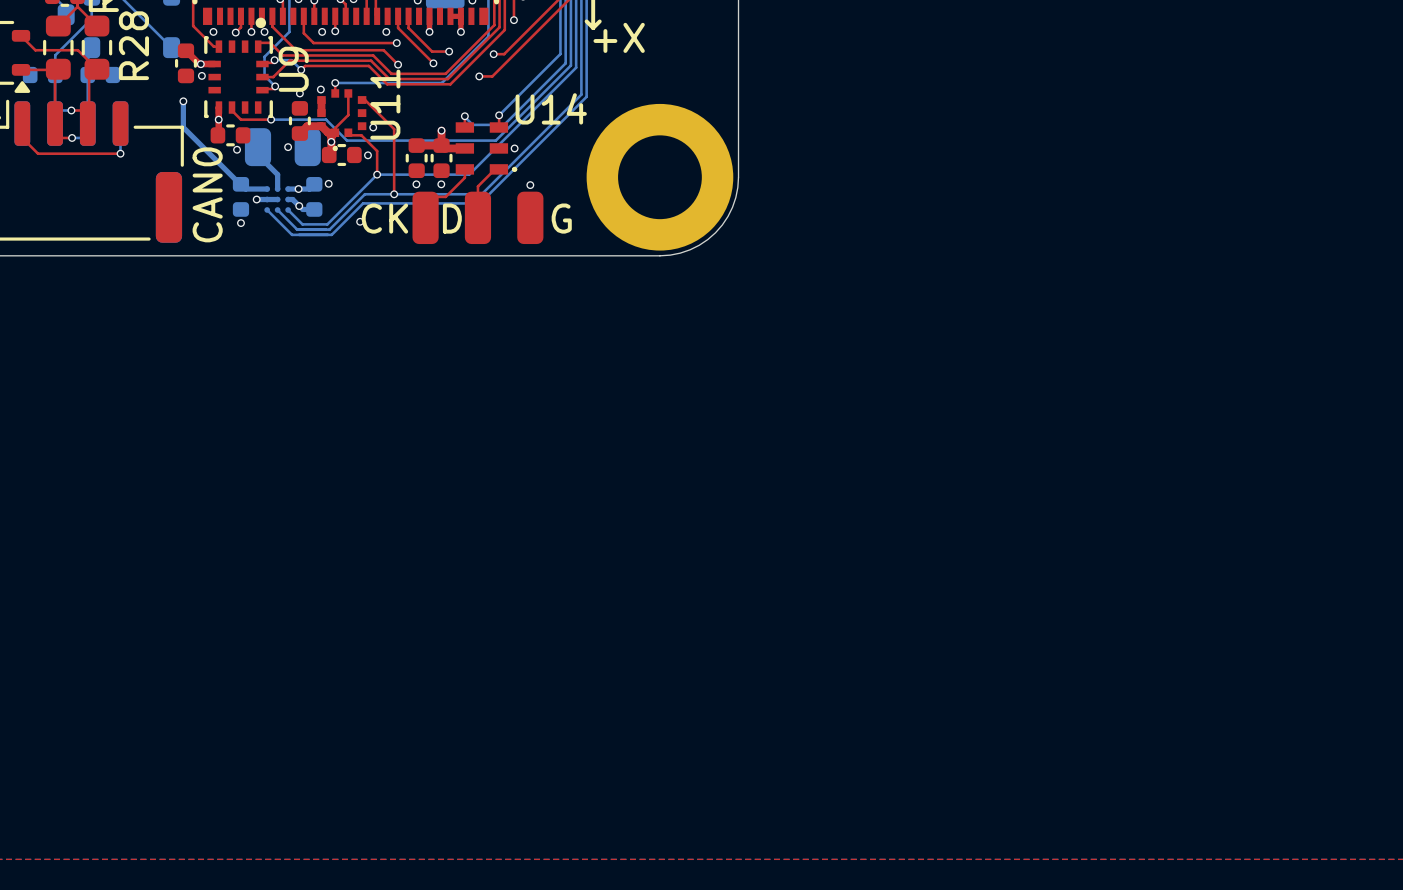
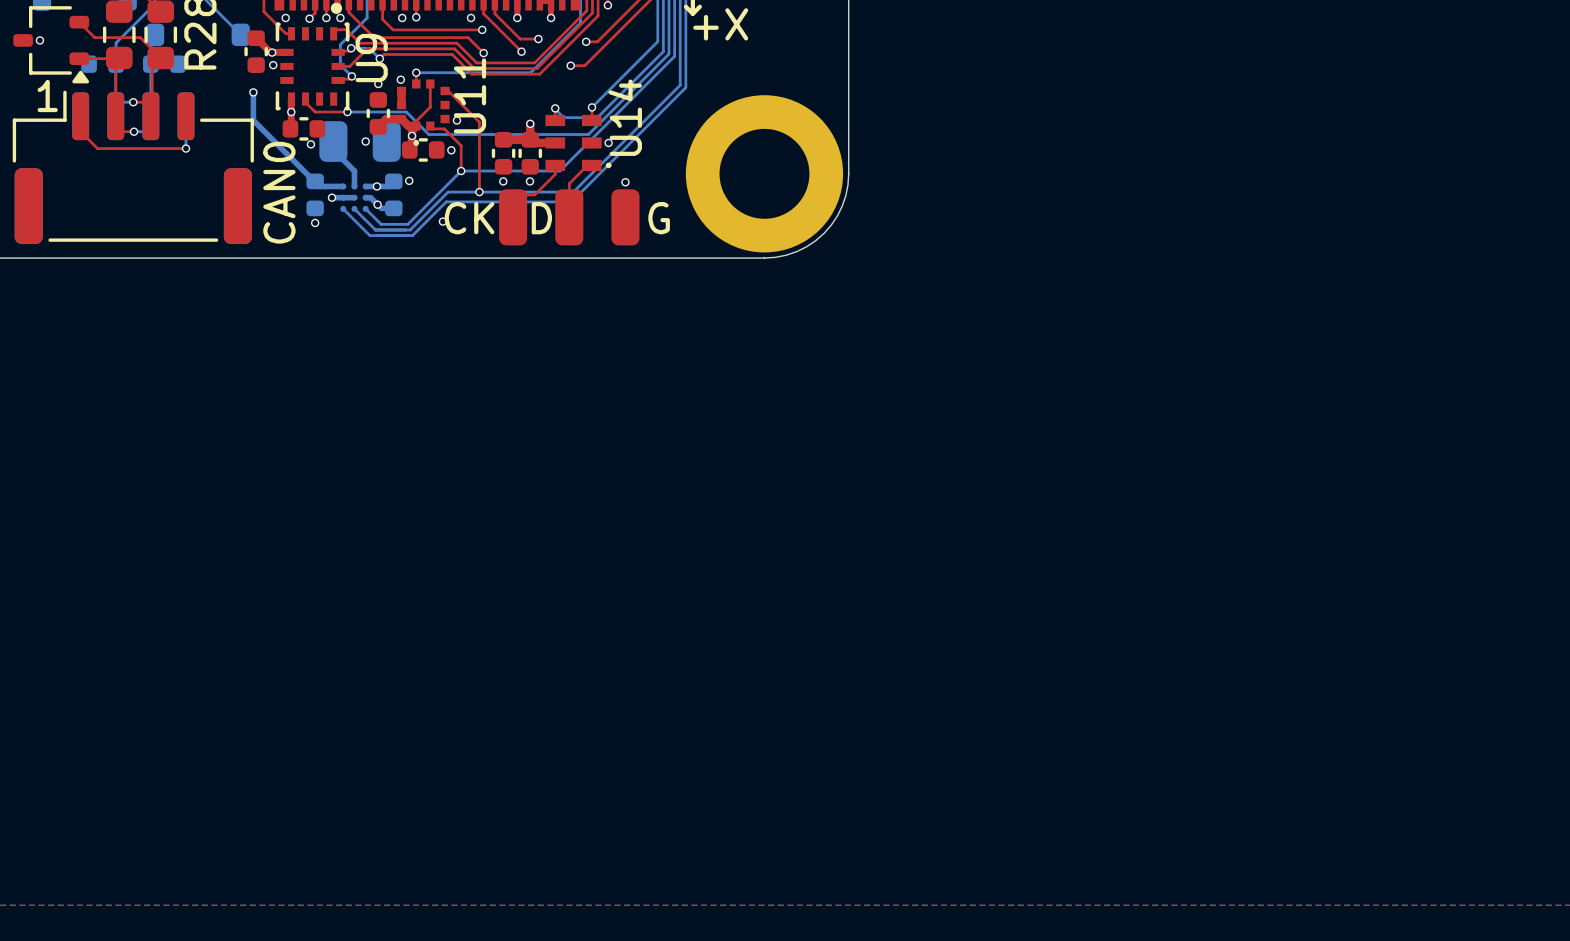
U14 name rotation: 0° (551, 108) -> 90° counterclockwise (625, 117)

